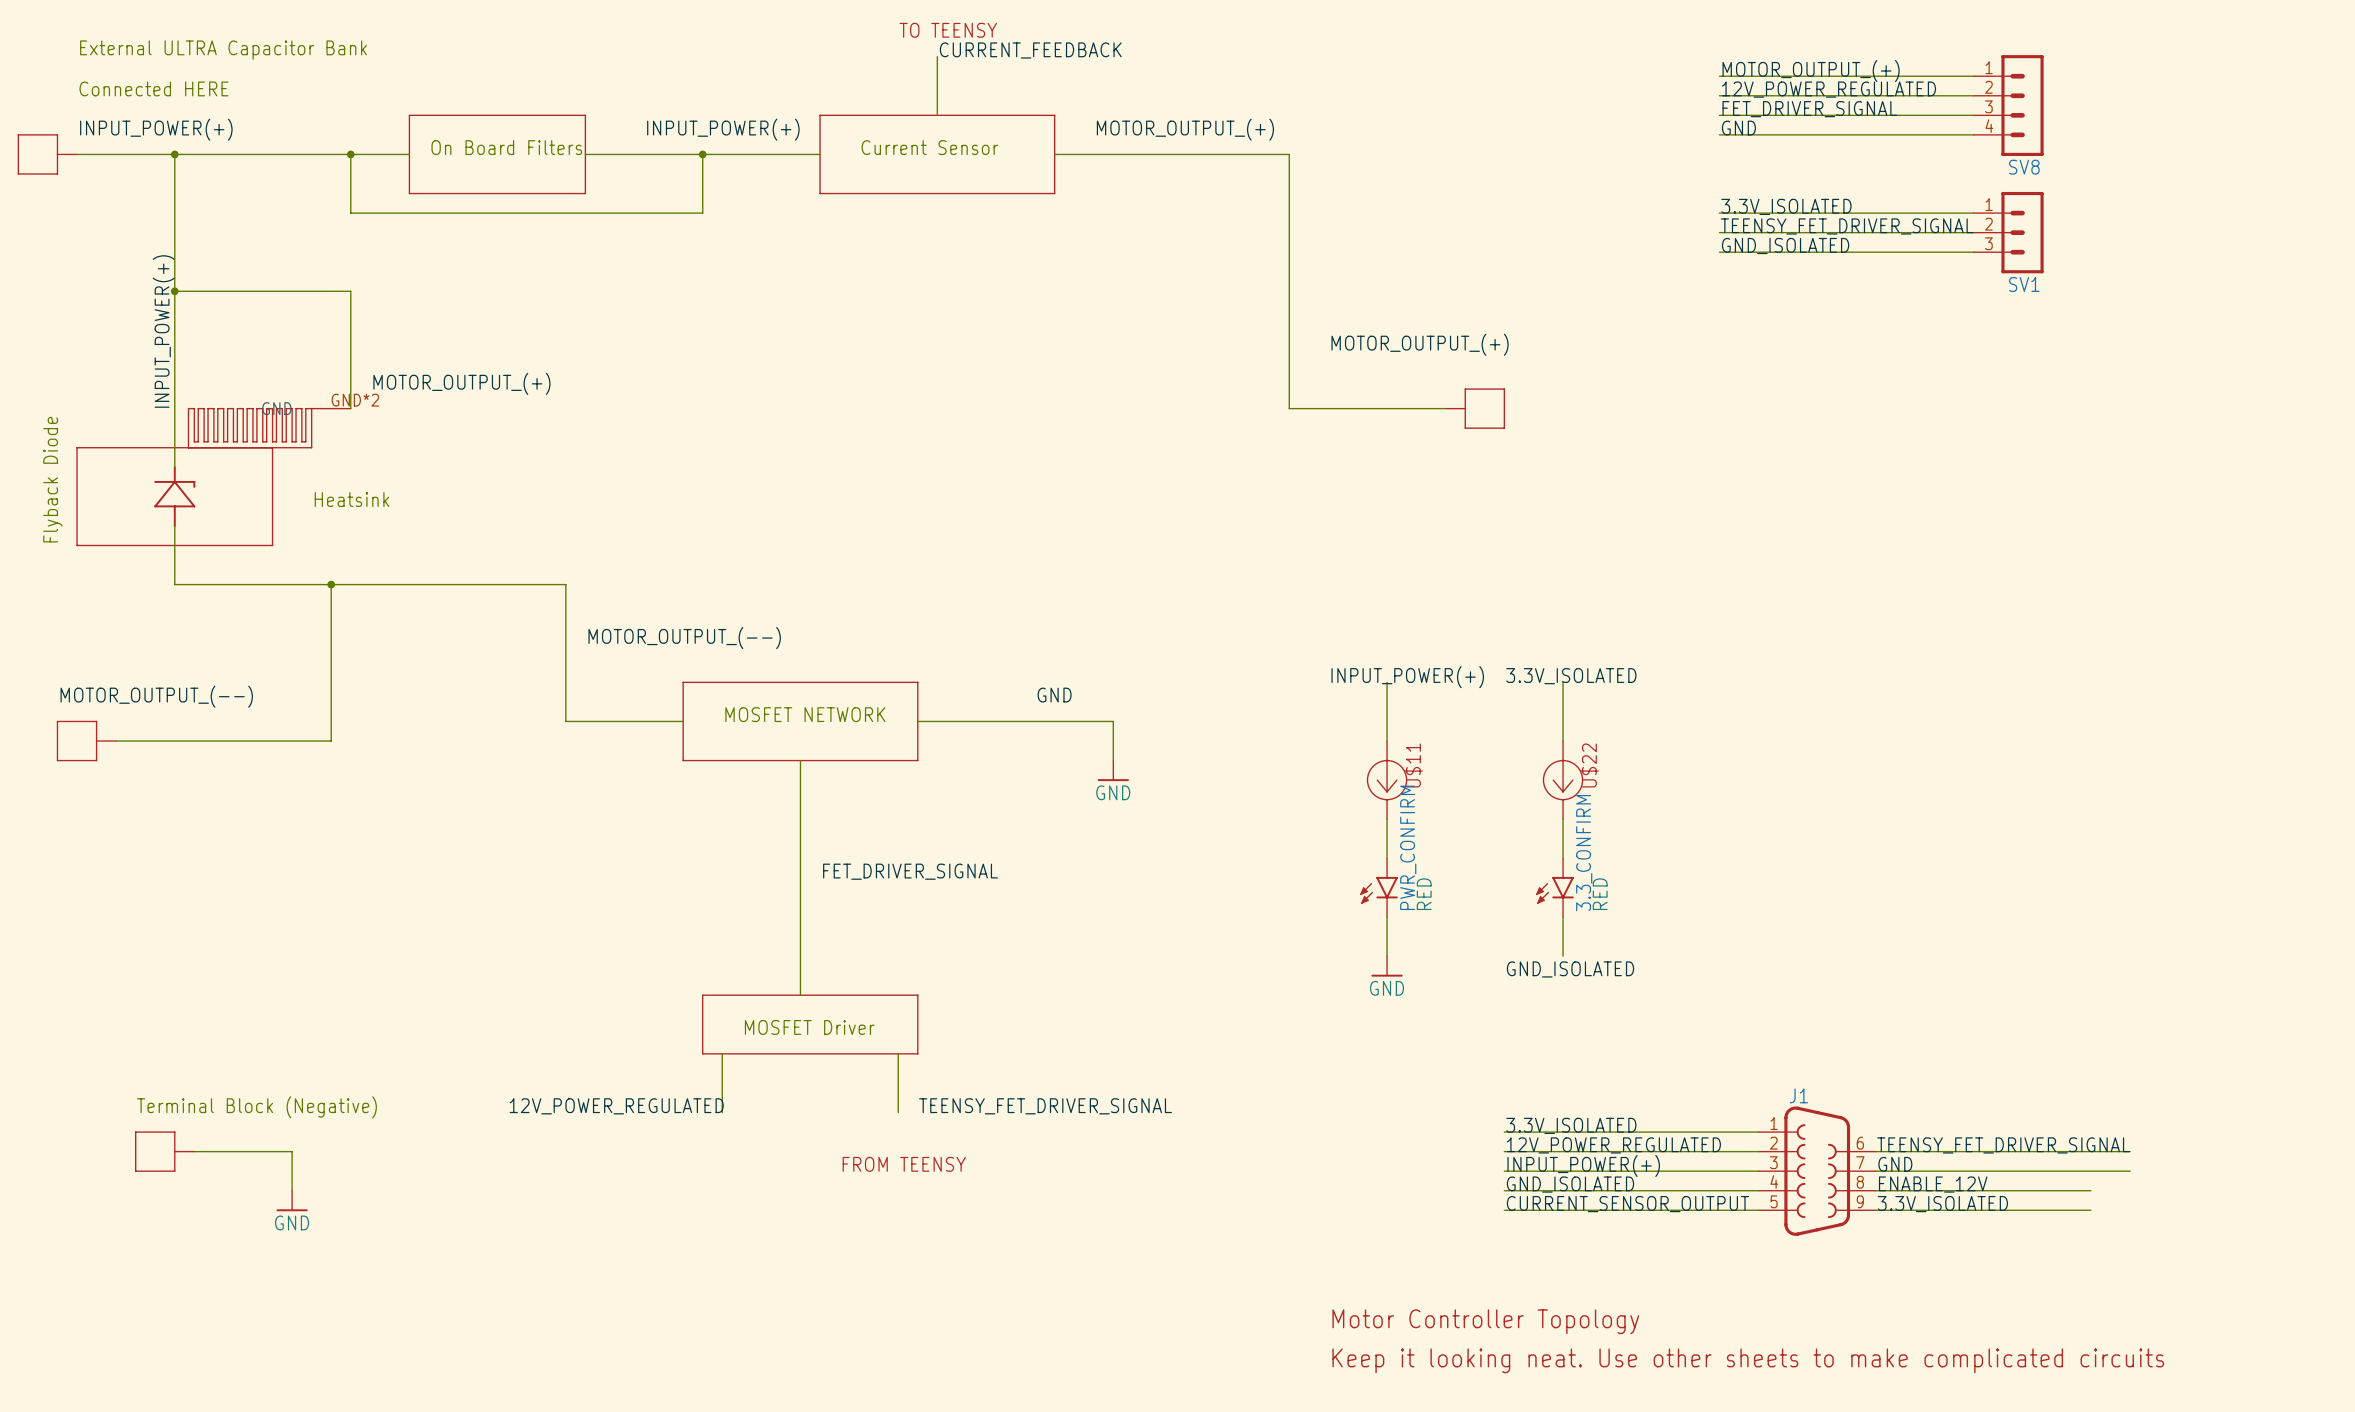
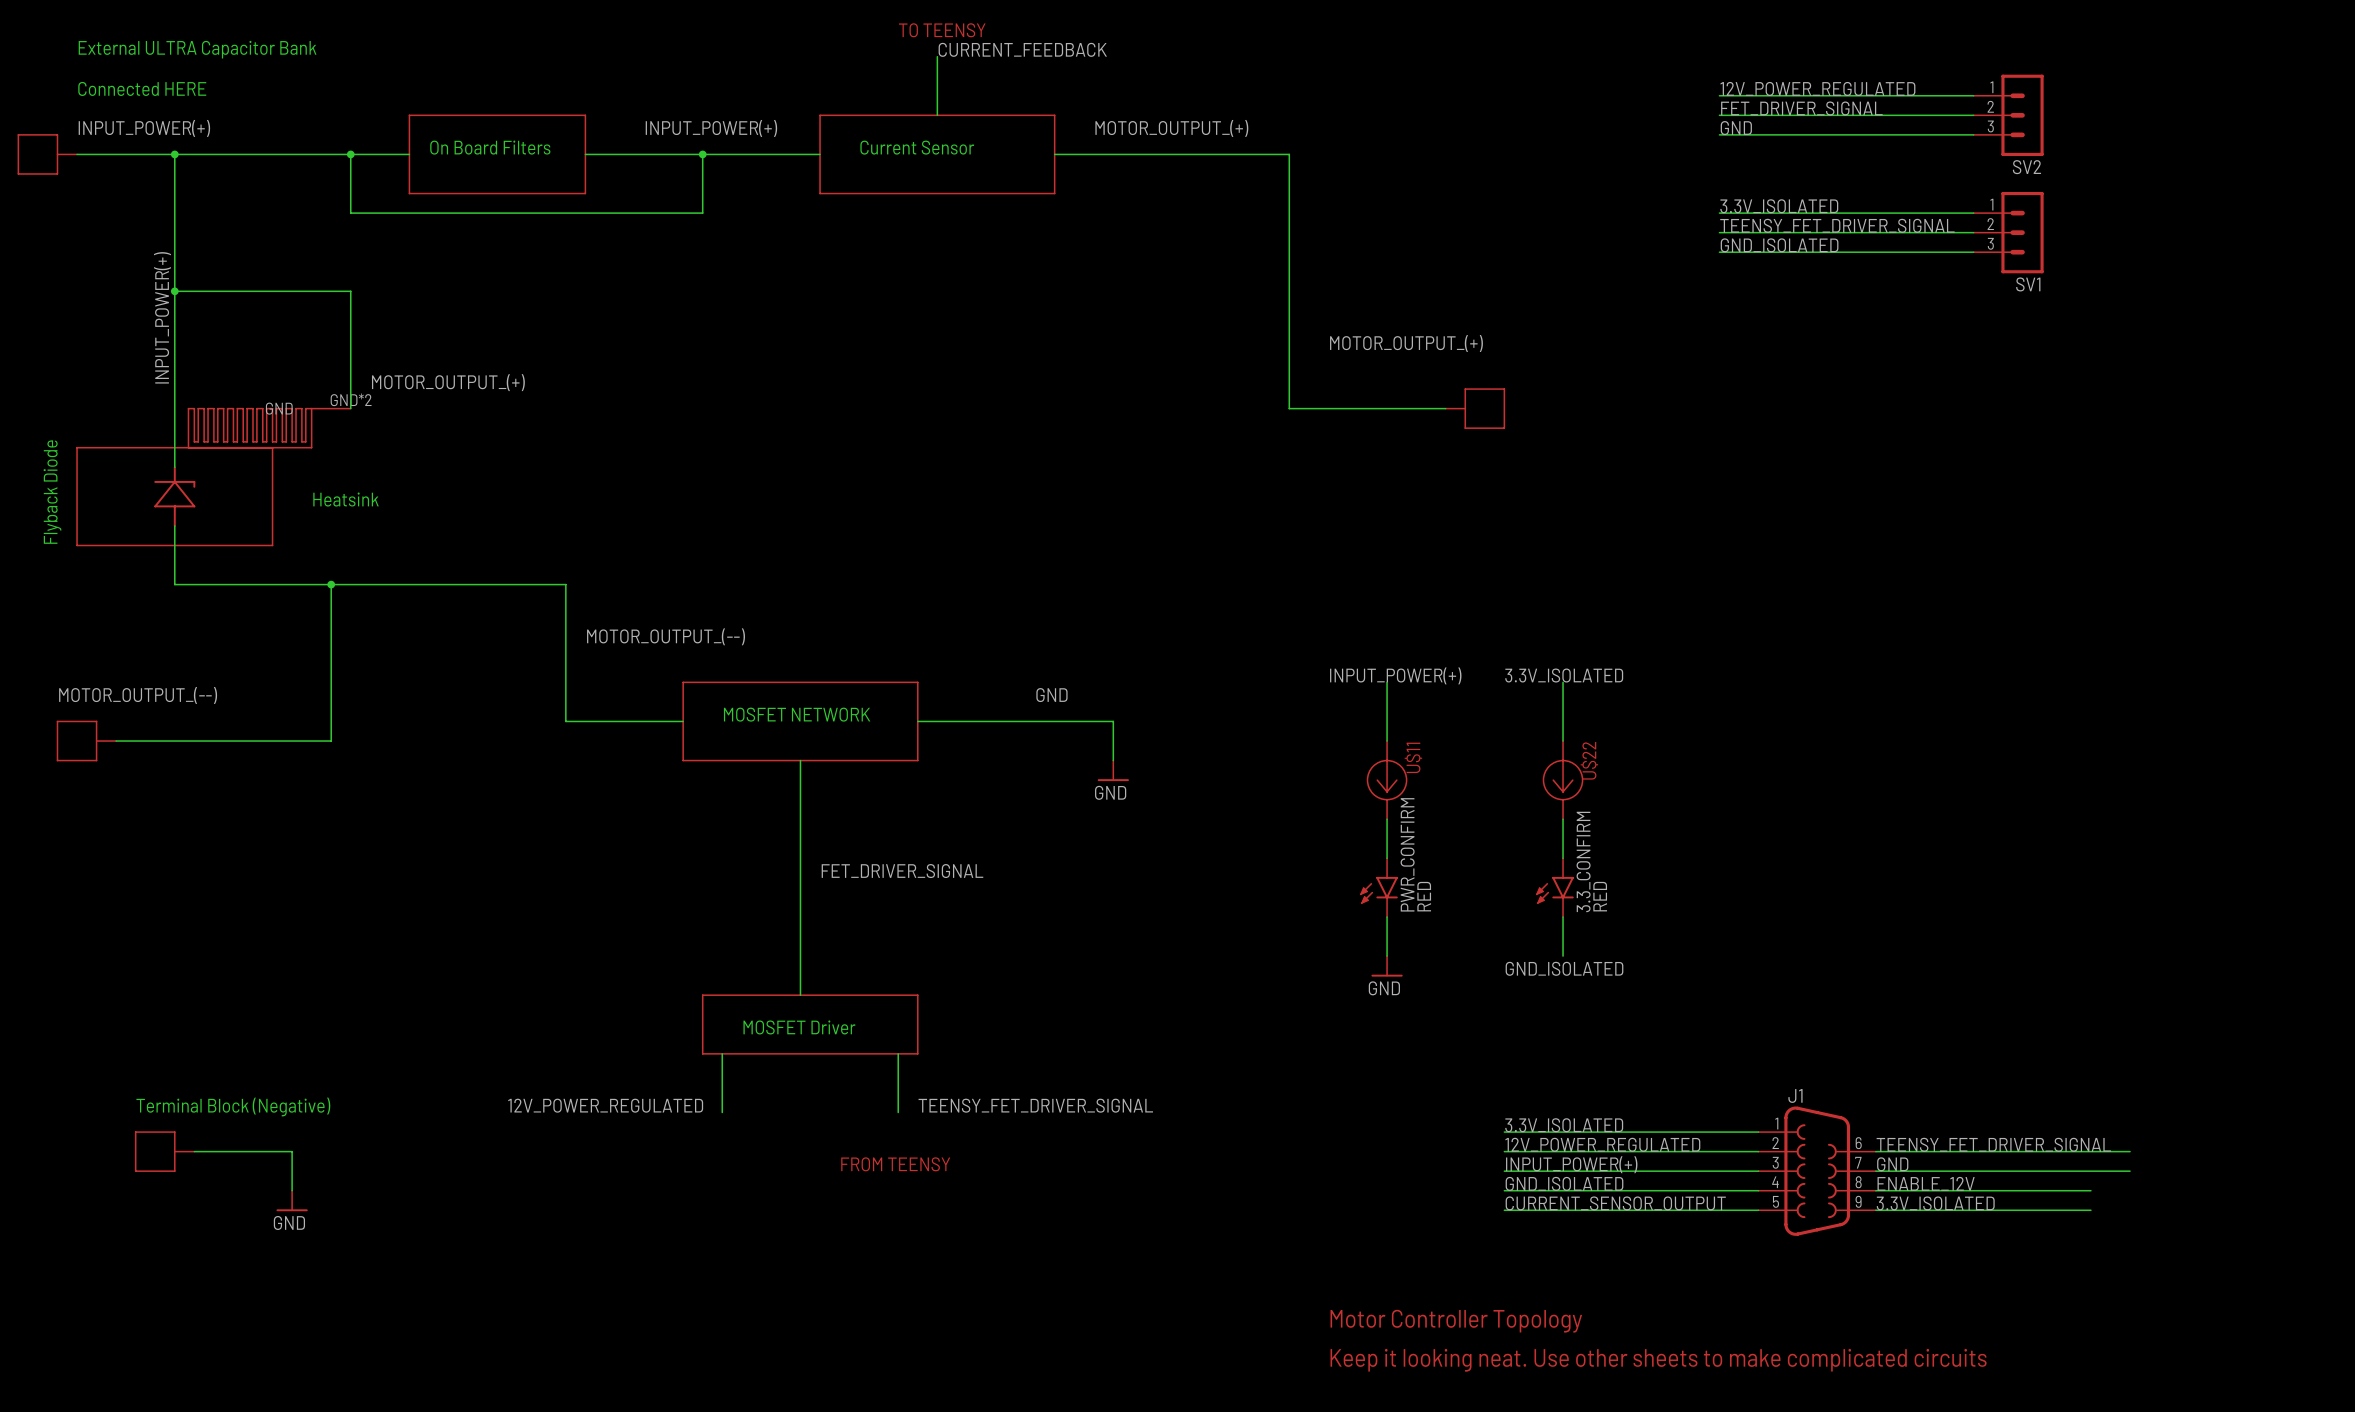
label: MOTOR_OUTPUT_(+) (1811, 71) -> none
wire: (1719, 76) (1973, 76) -> none
SV8: (2008, 105) -> none
SV2: none -> (2008, 115)

